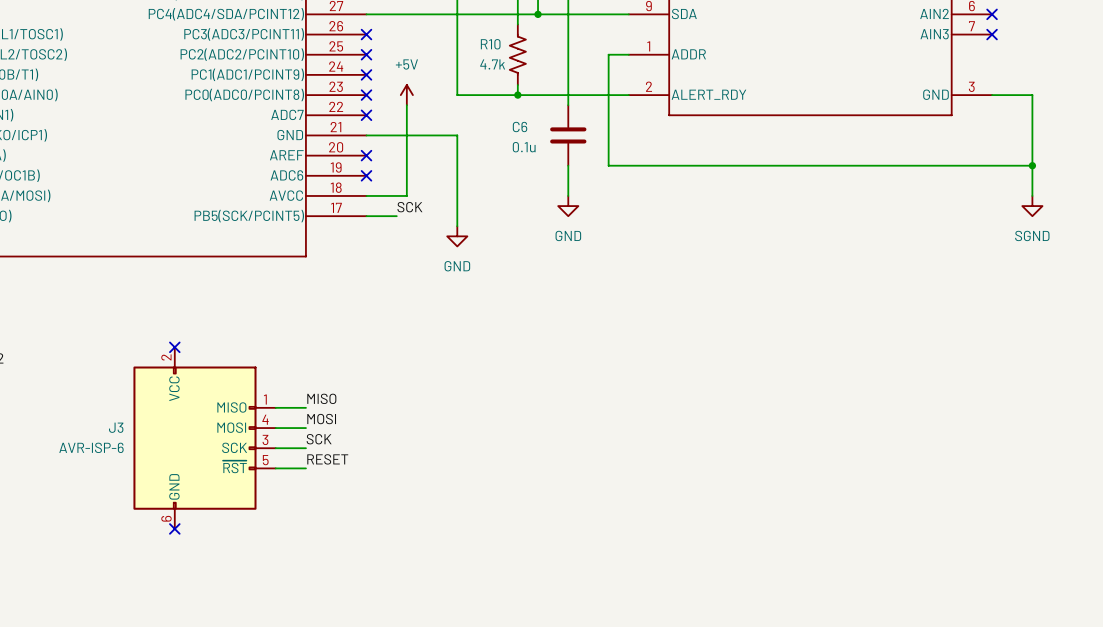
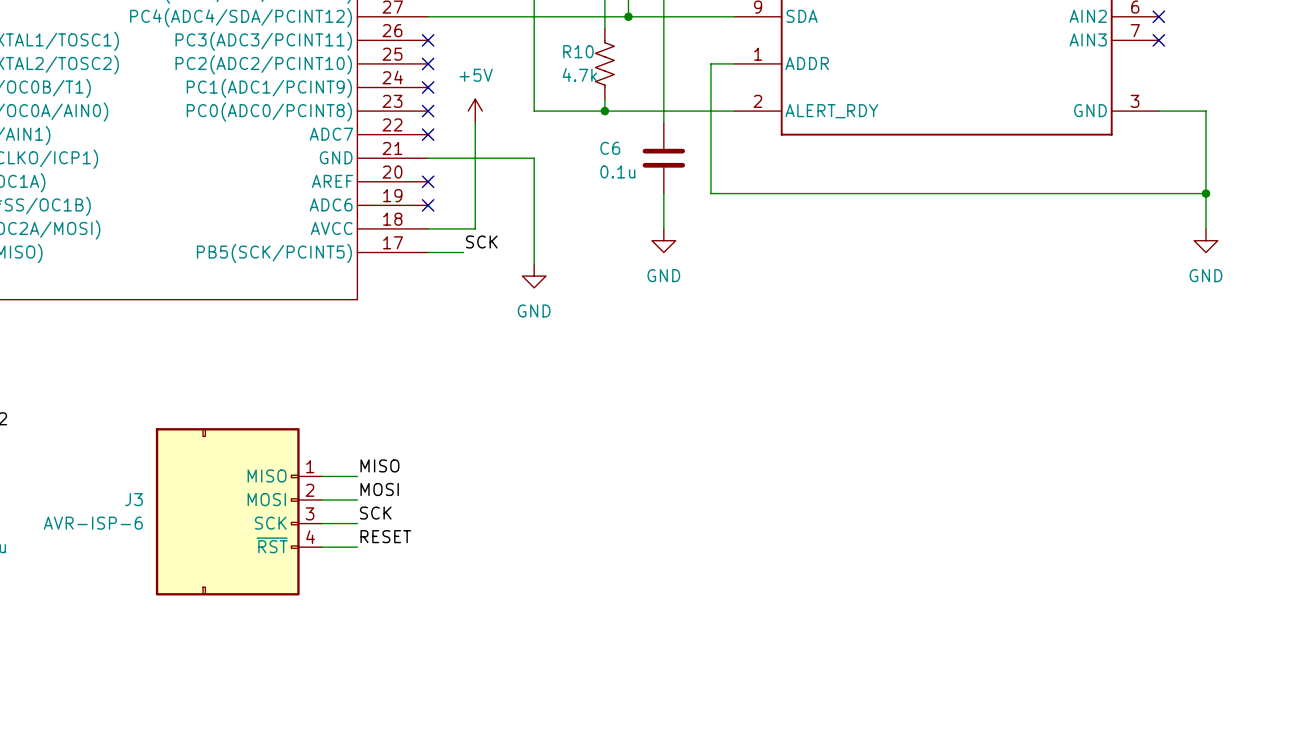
power symbol: SGND (1032, 206) -> GND (1205, 240)
J3 symbol: [133, 347, 276, 529] -> [155, 428, 323, 596]
no-connect mark: (174, 347) -> none
no-connect mark: (174, 528) -> none

